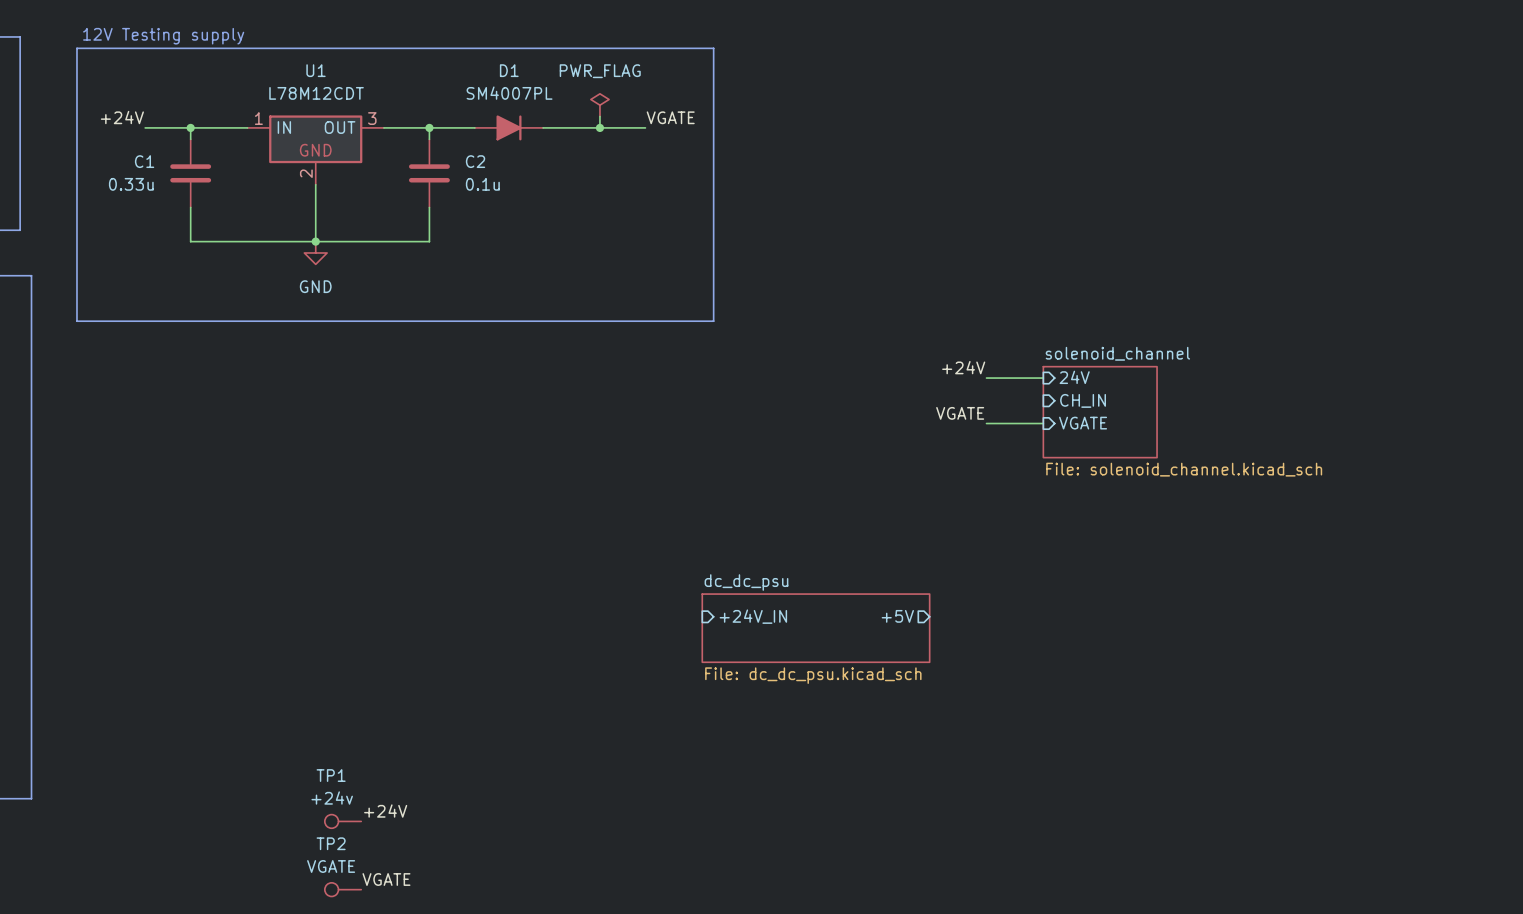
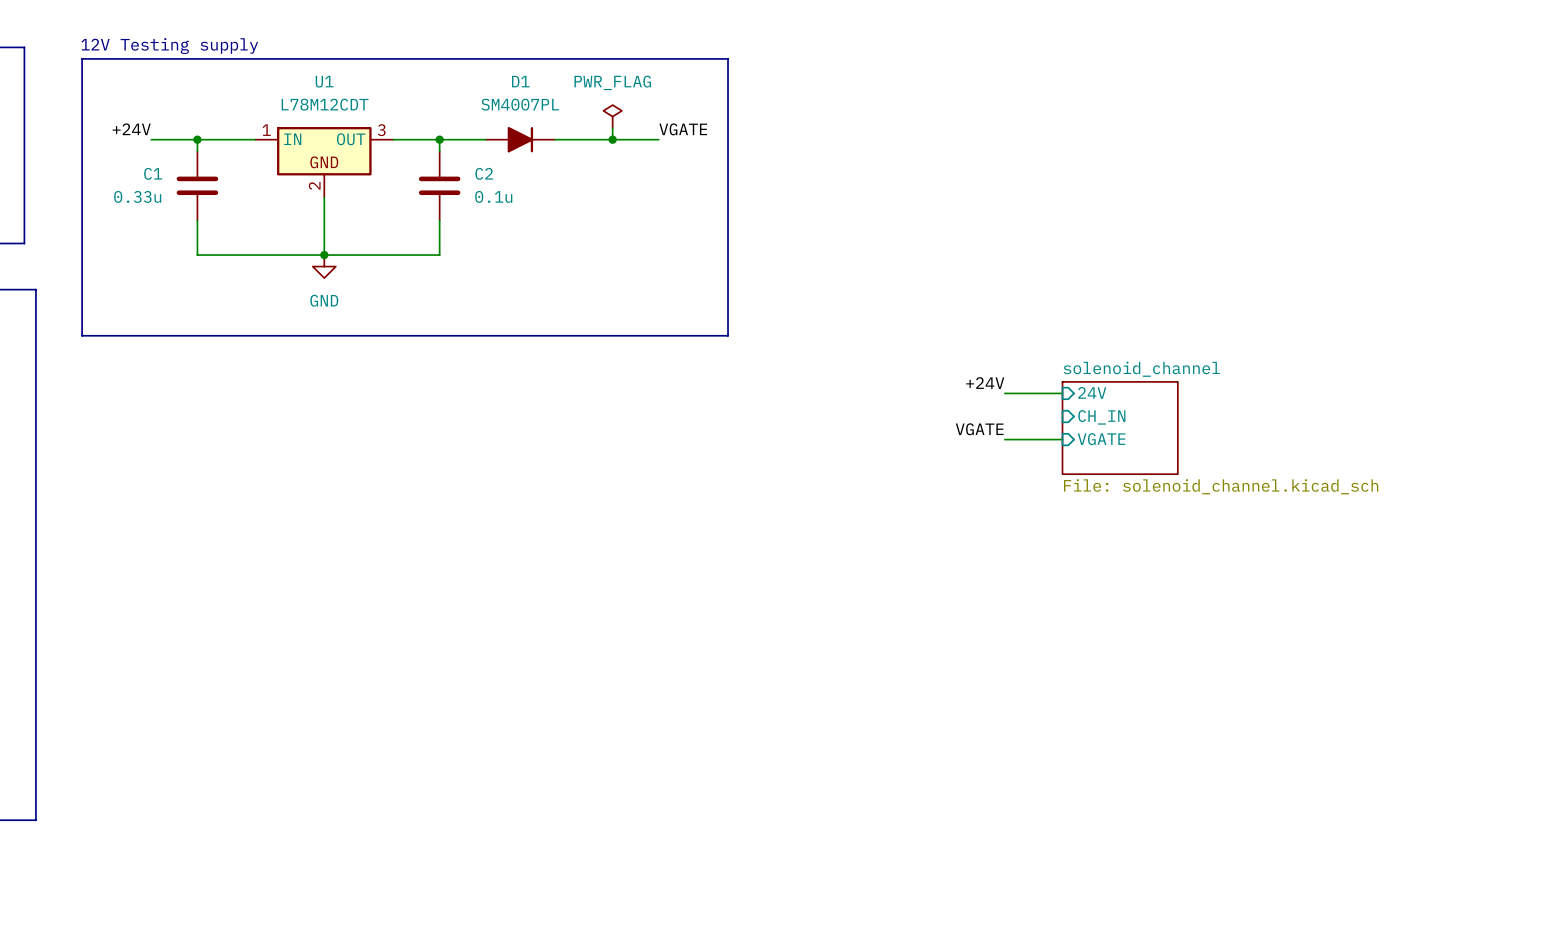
sheet pin: +24V_IN (753, 616) -> none
sheet pin: +5V (897, 616) -> none
sheet dc_dc_psu: File: dc_dc_psu.kicad_sch (815, 628) -> none
label: +24V (385, 811) -> none
TP1: +24v (343, 821) -> none
label: VGATE (386, 879) -> none
TP2: VGATE (343, 889) -> none

